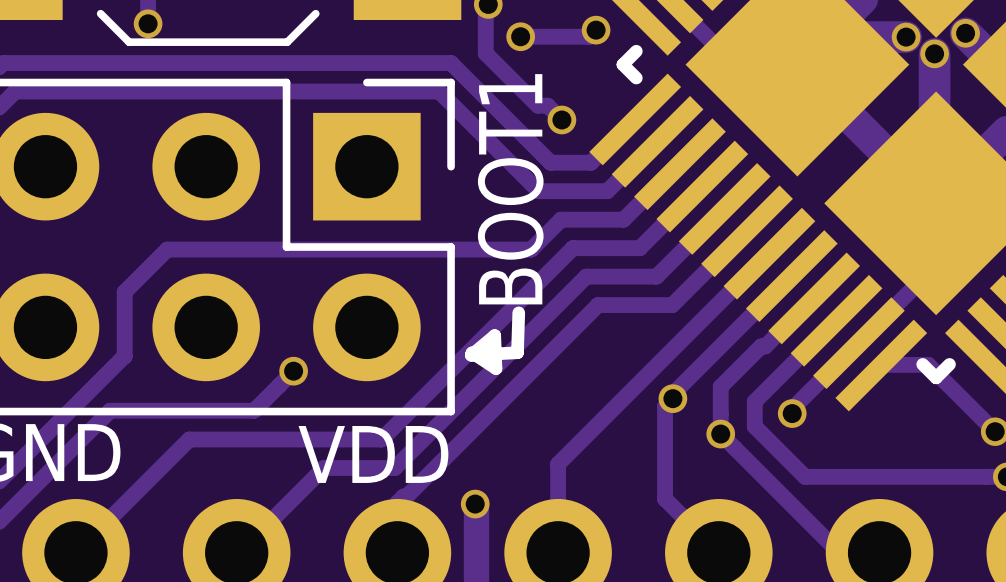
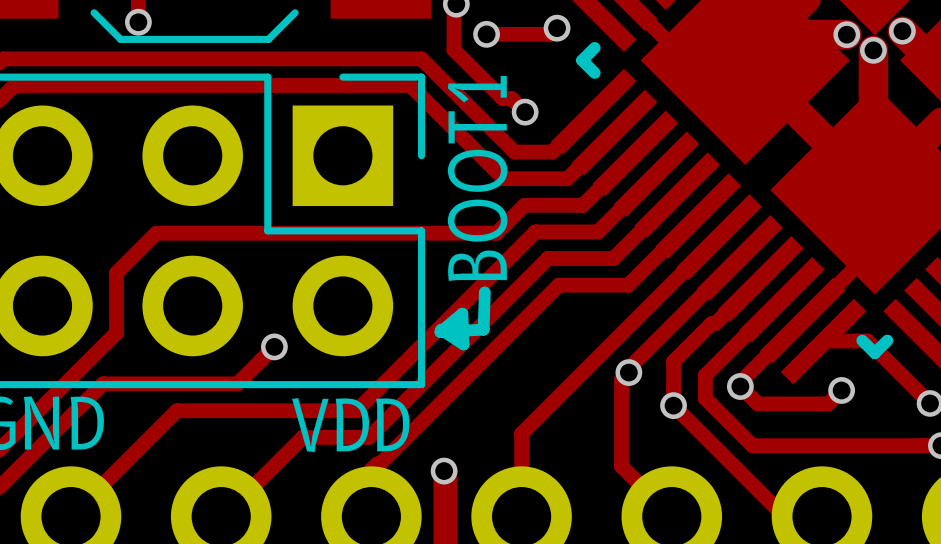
track: none -> (741, 387) (757, 403) (828, 403) (841, 390)
via: none -> (841, 390)

